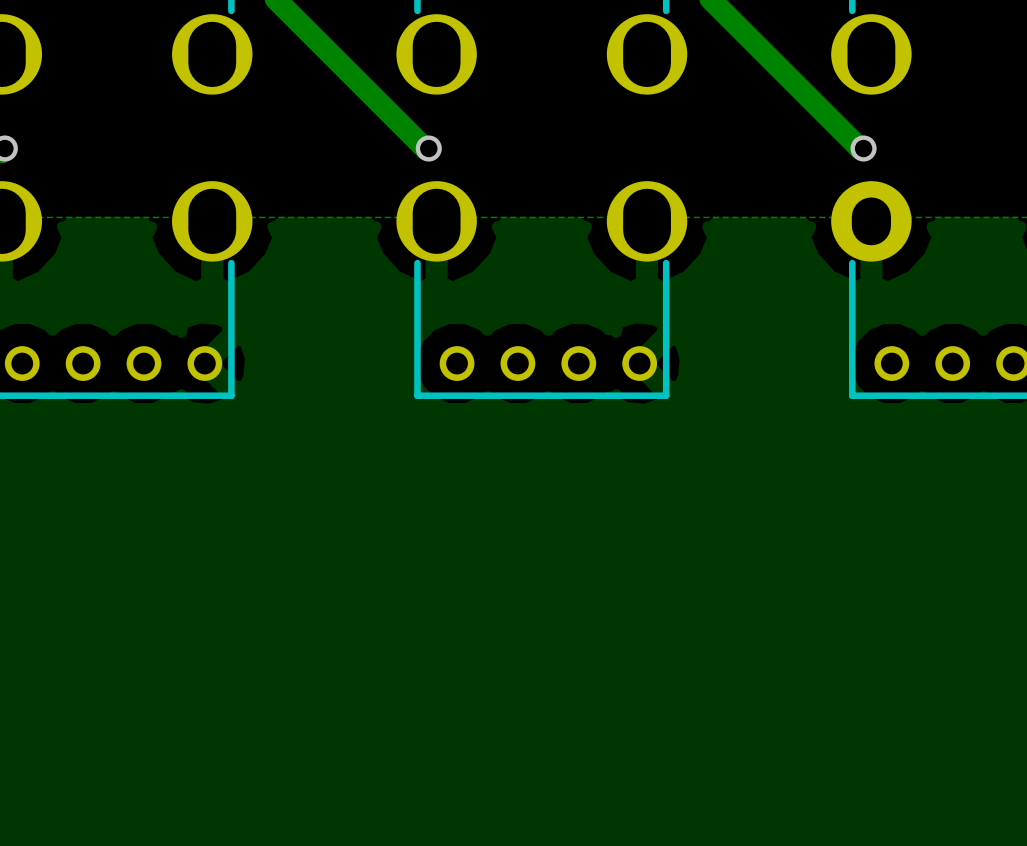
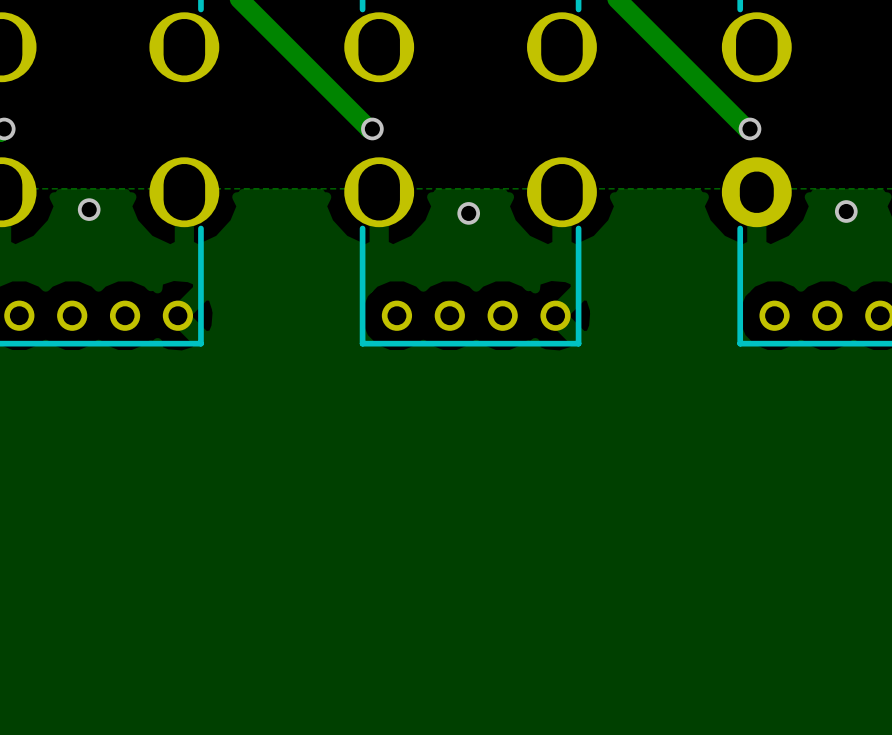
via: none -> (89, 209)
via: none -> (846, 211)
via: none -> (468, 213)

